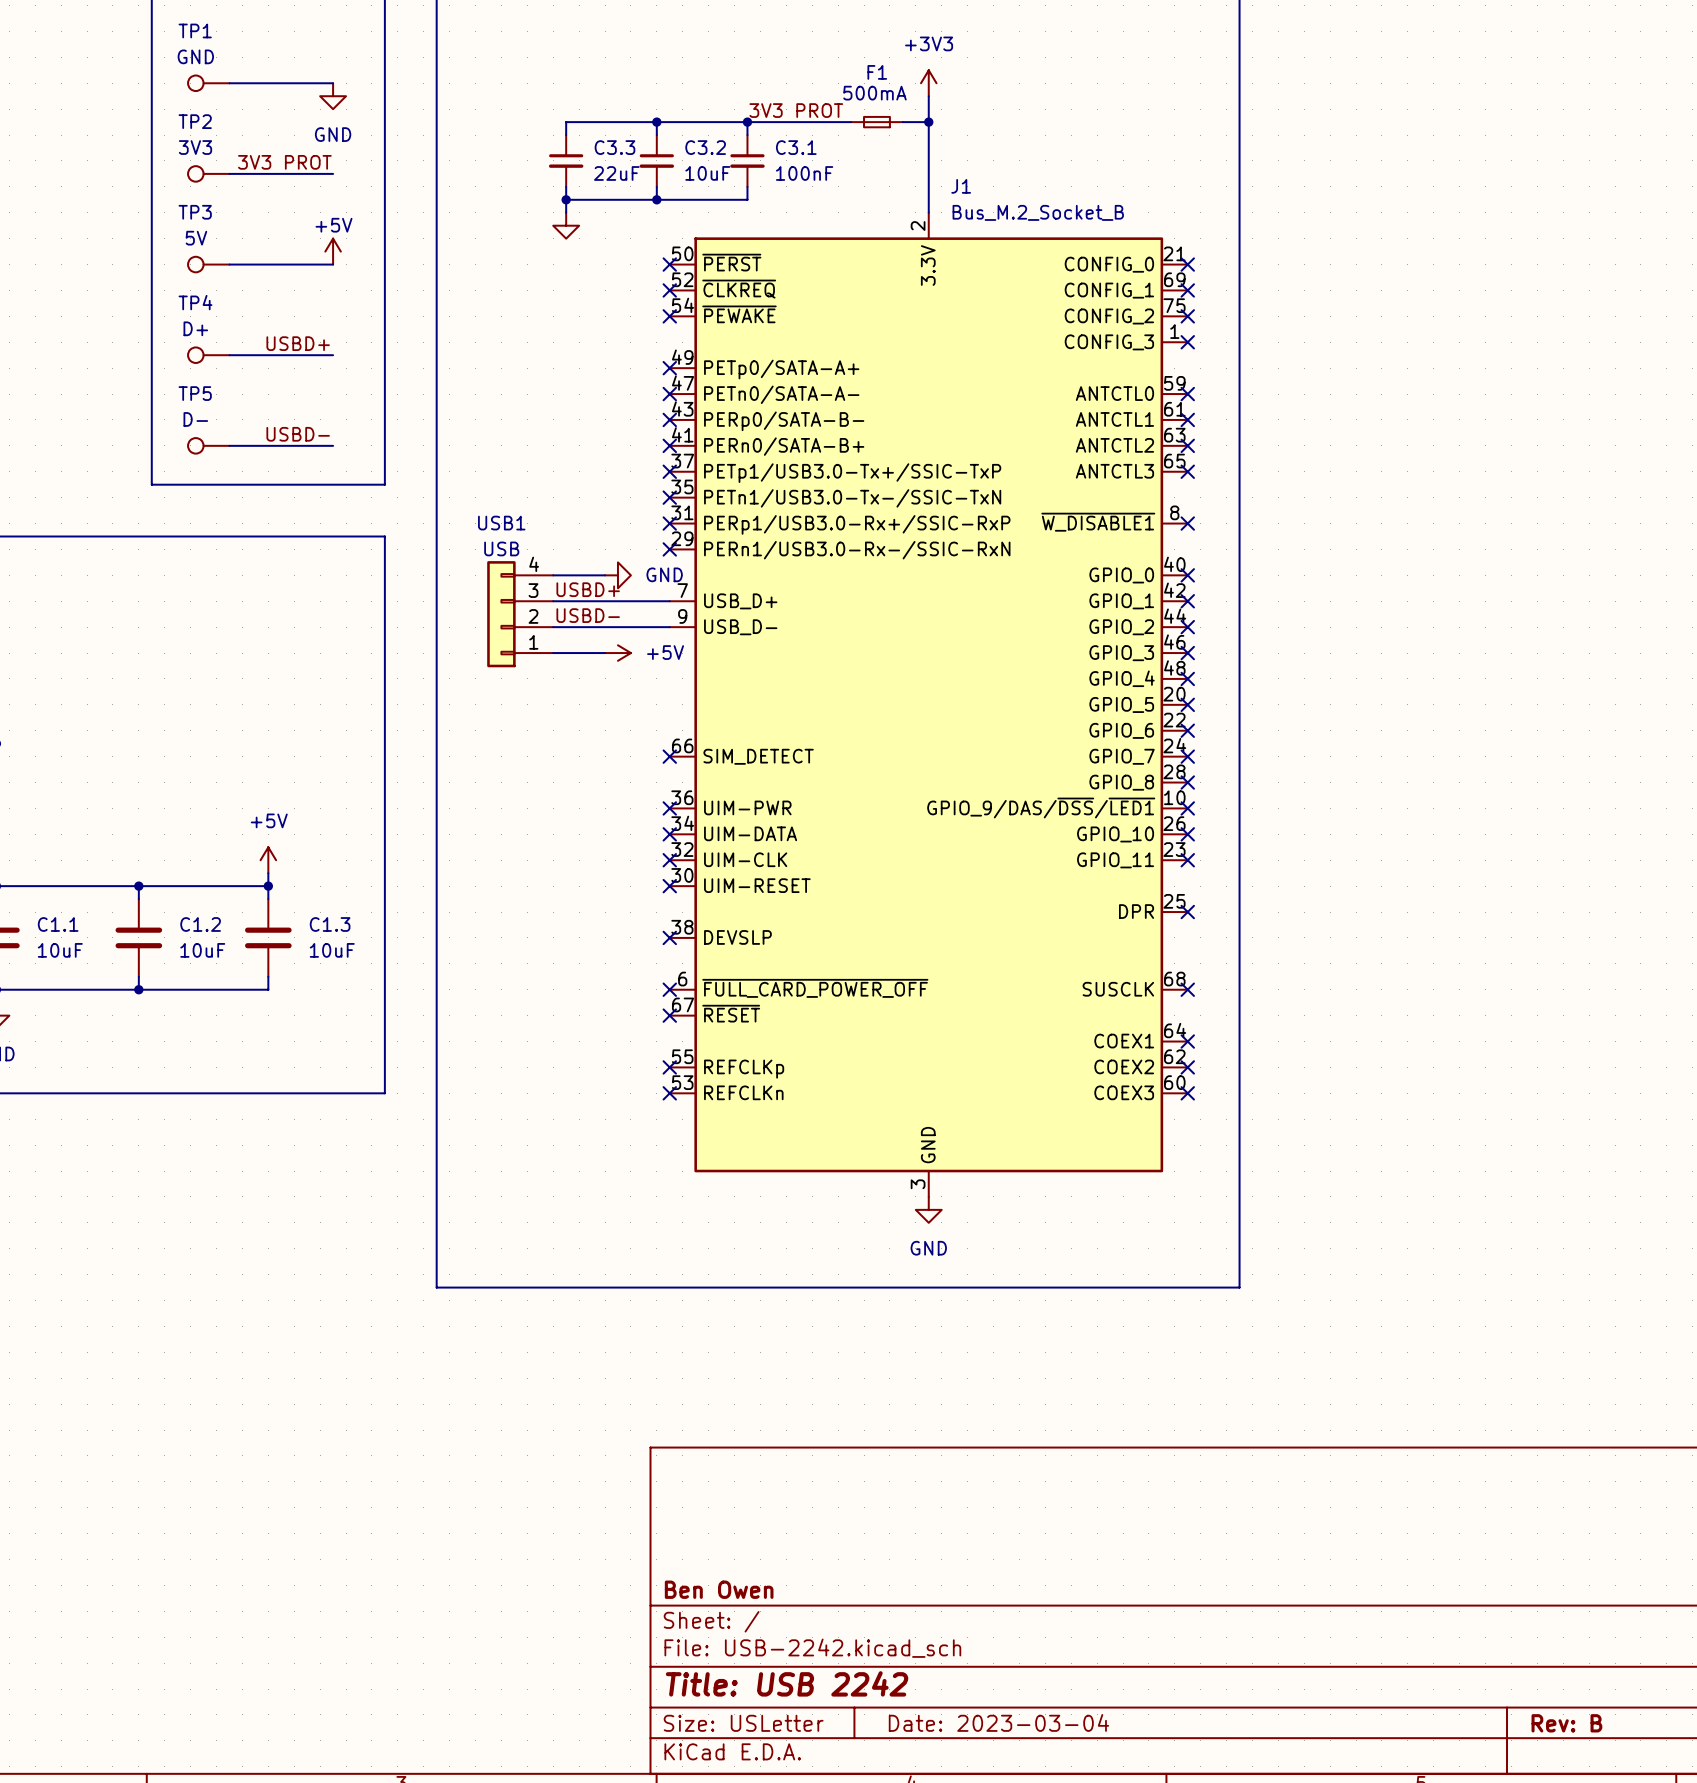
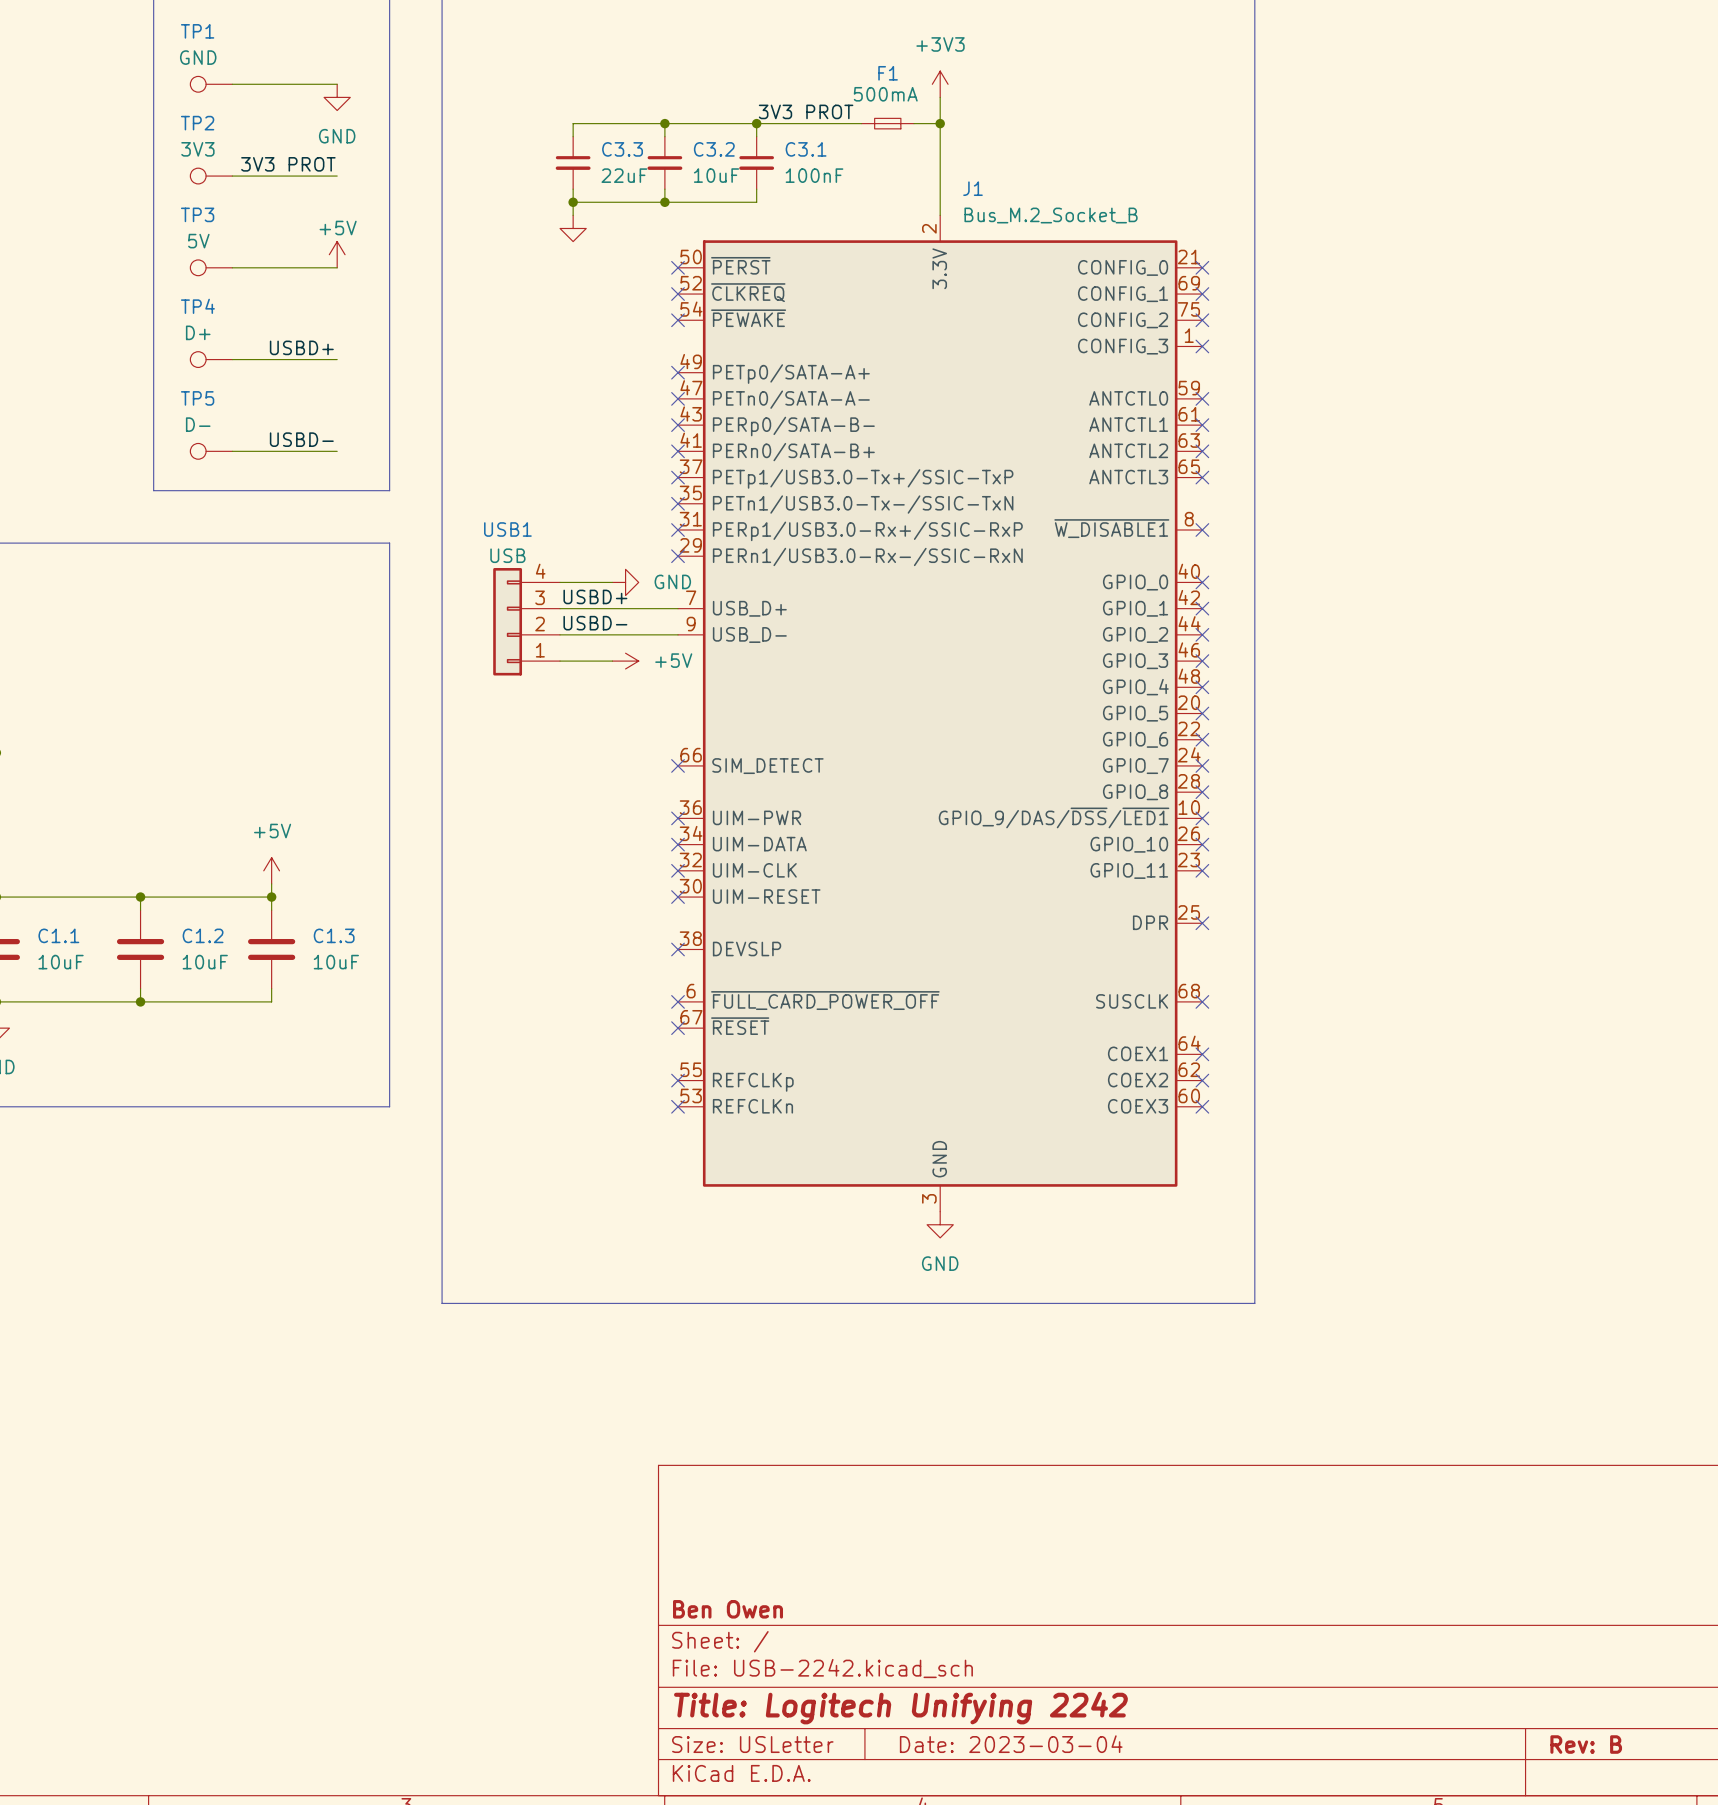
title block: Title: USB 2242 (787, 1683) -> Title: Logitech Unifying 2242 (900, 1708)

